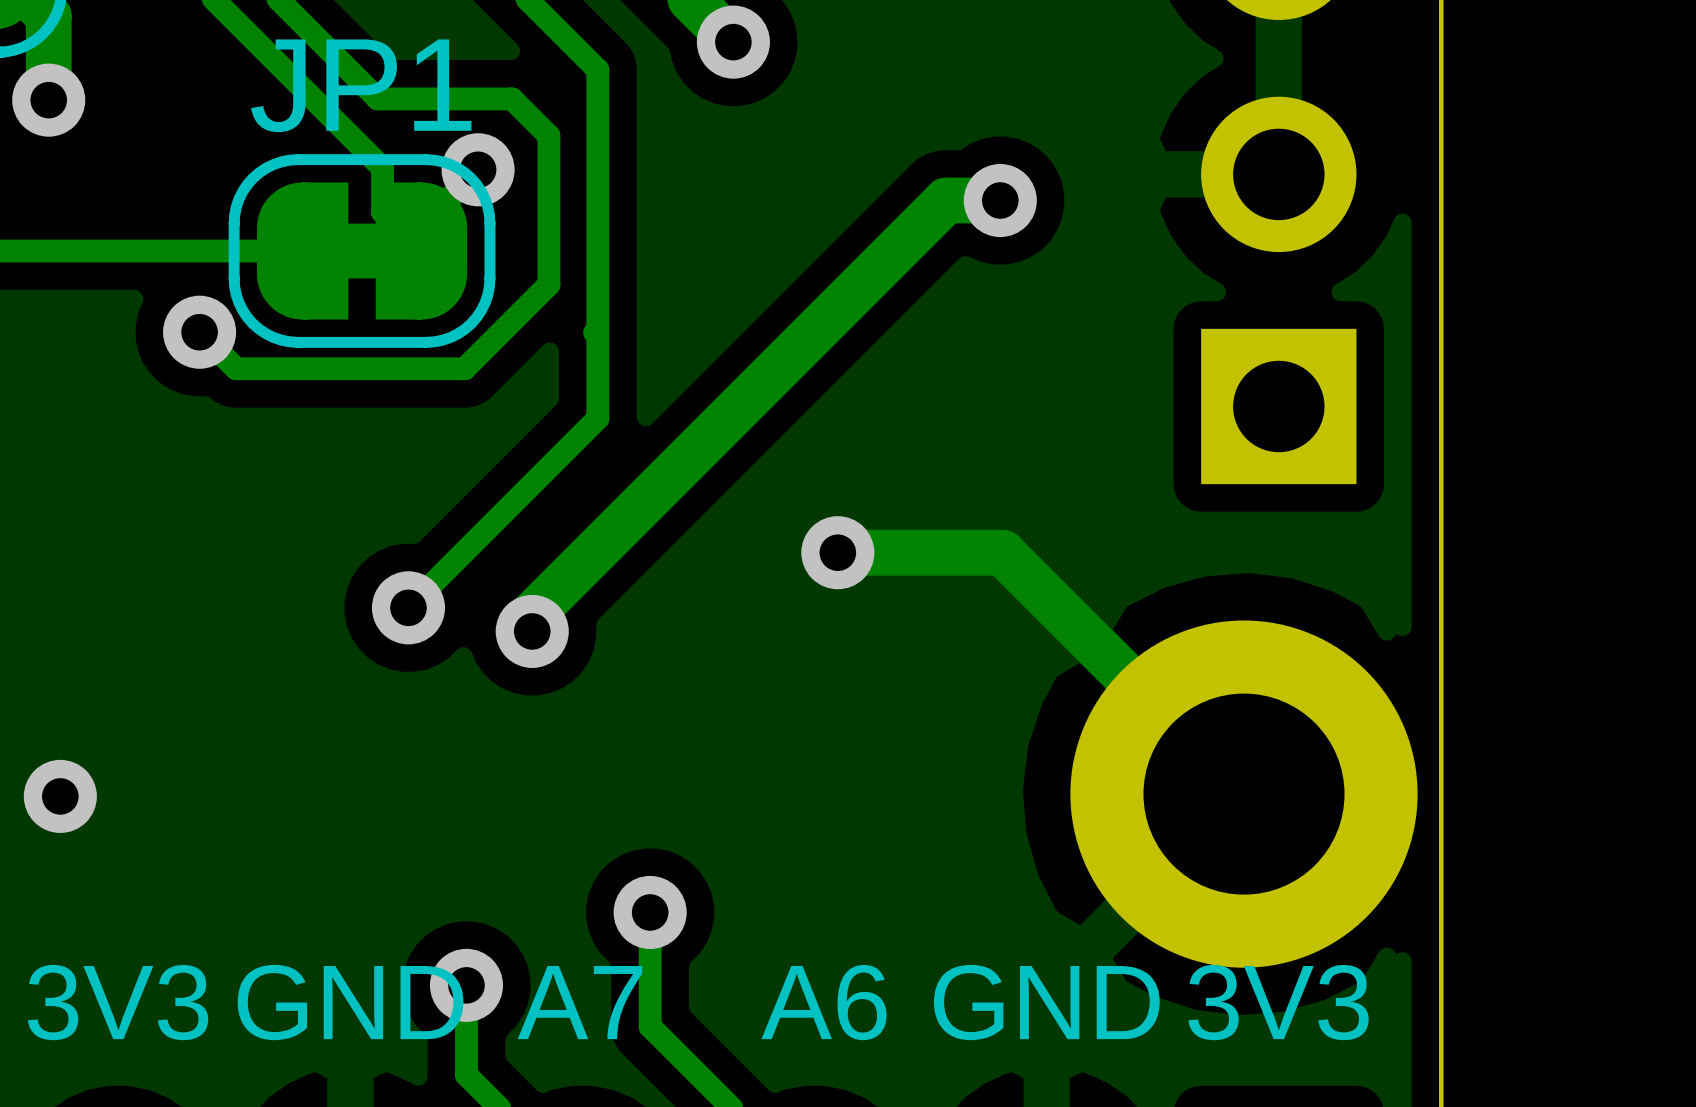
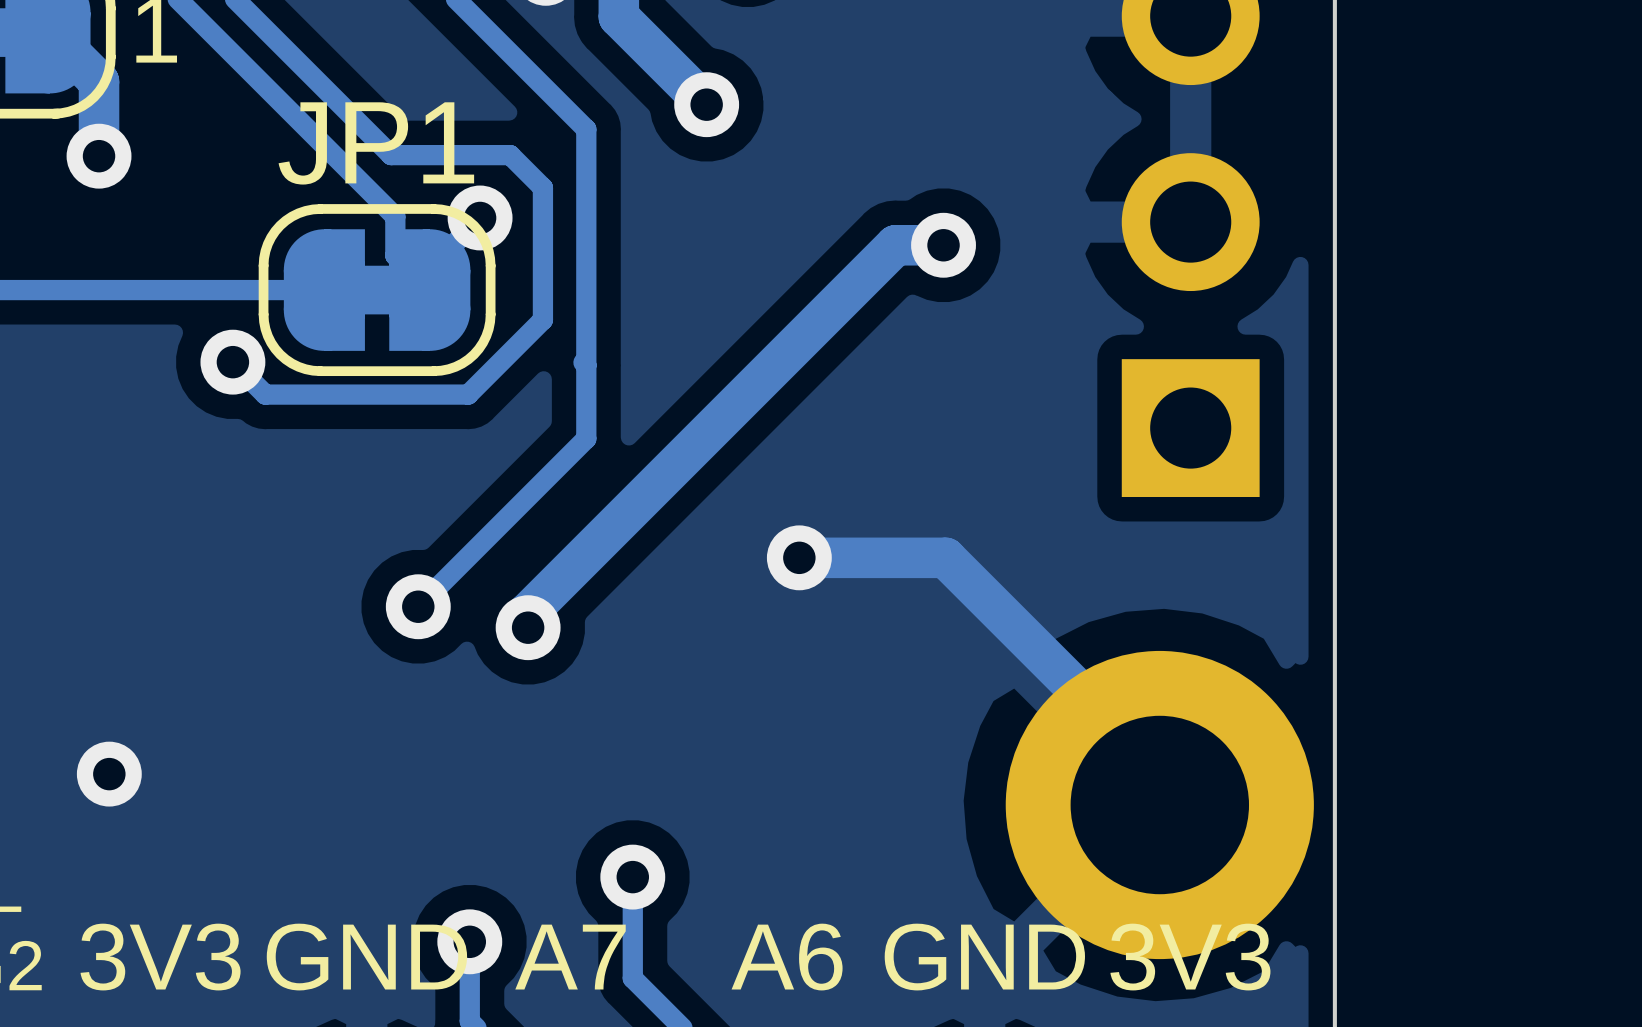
part position: (1244, 794) -> (1159, 805)

